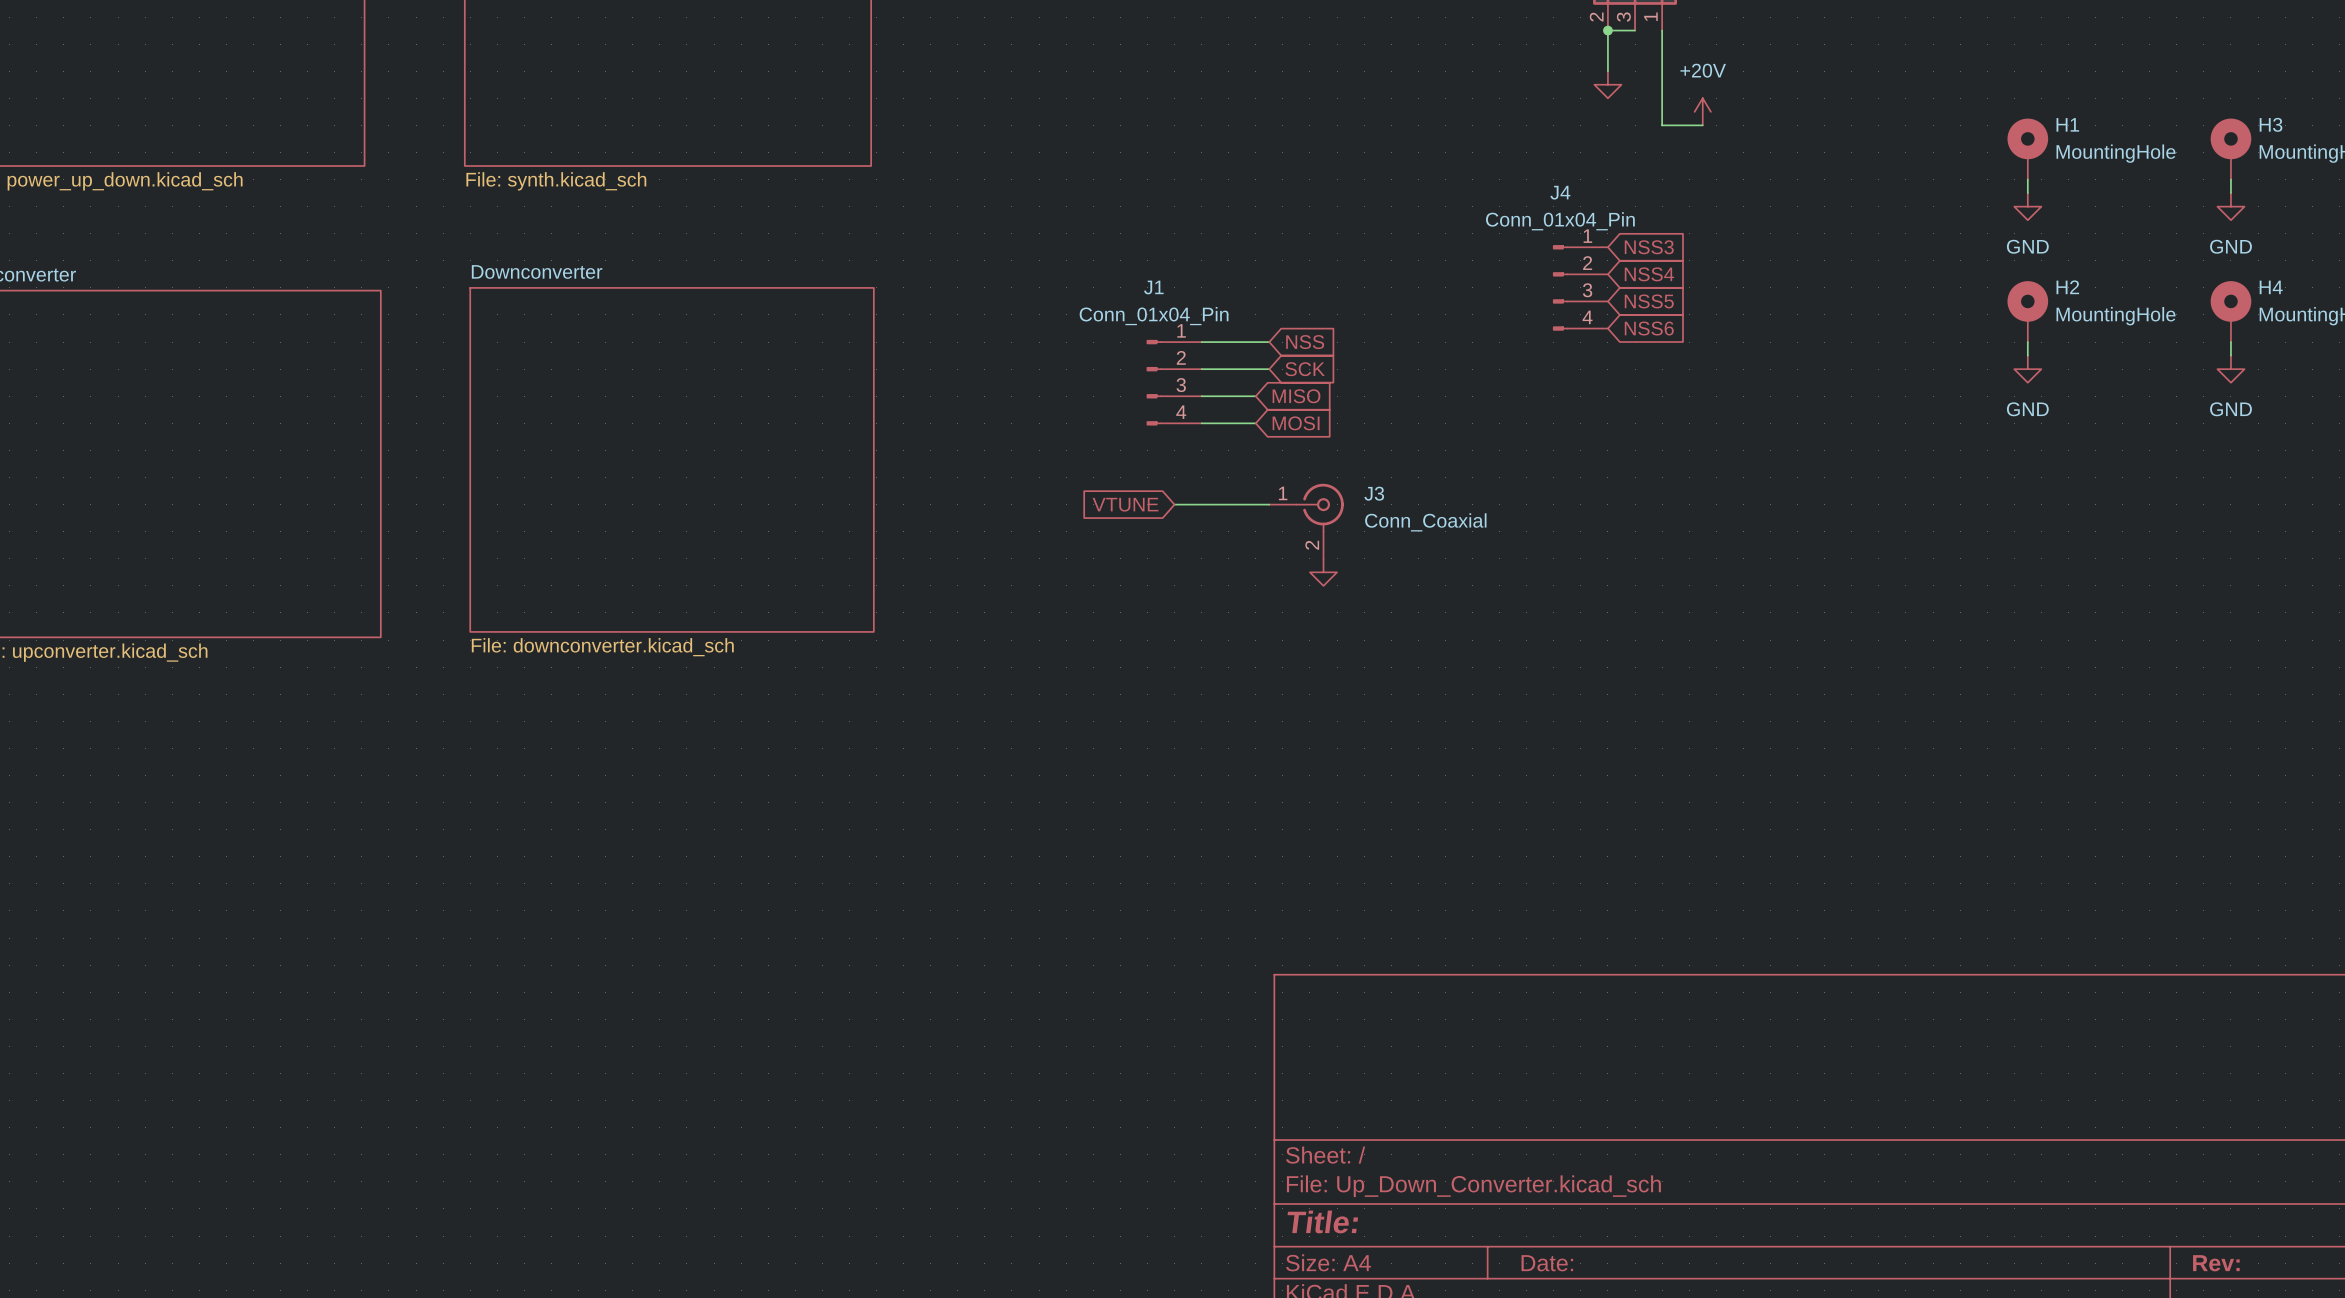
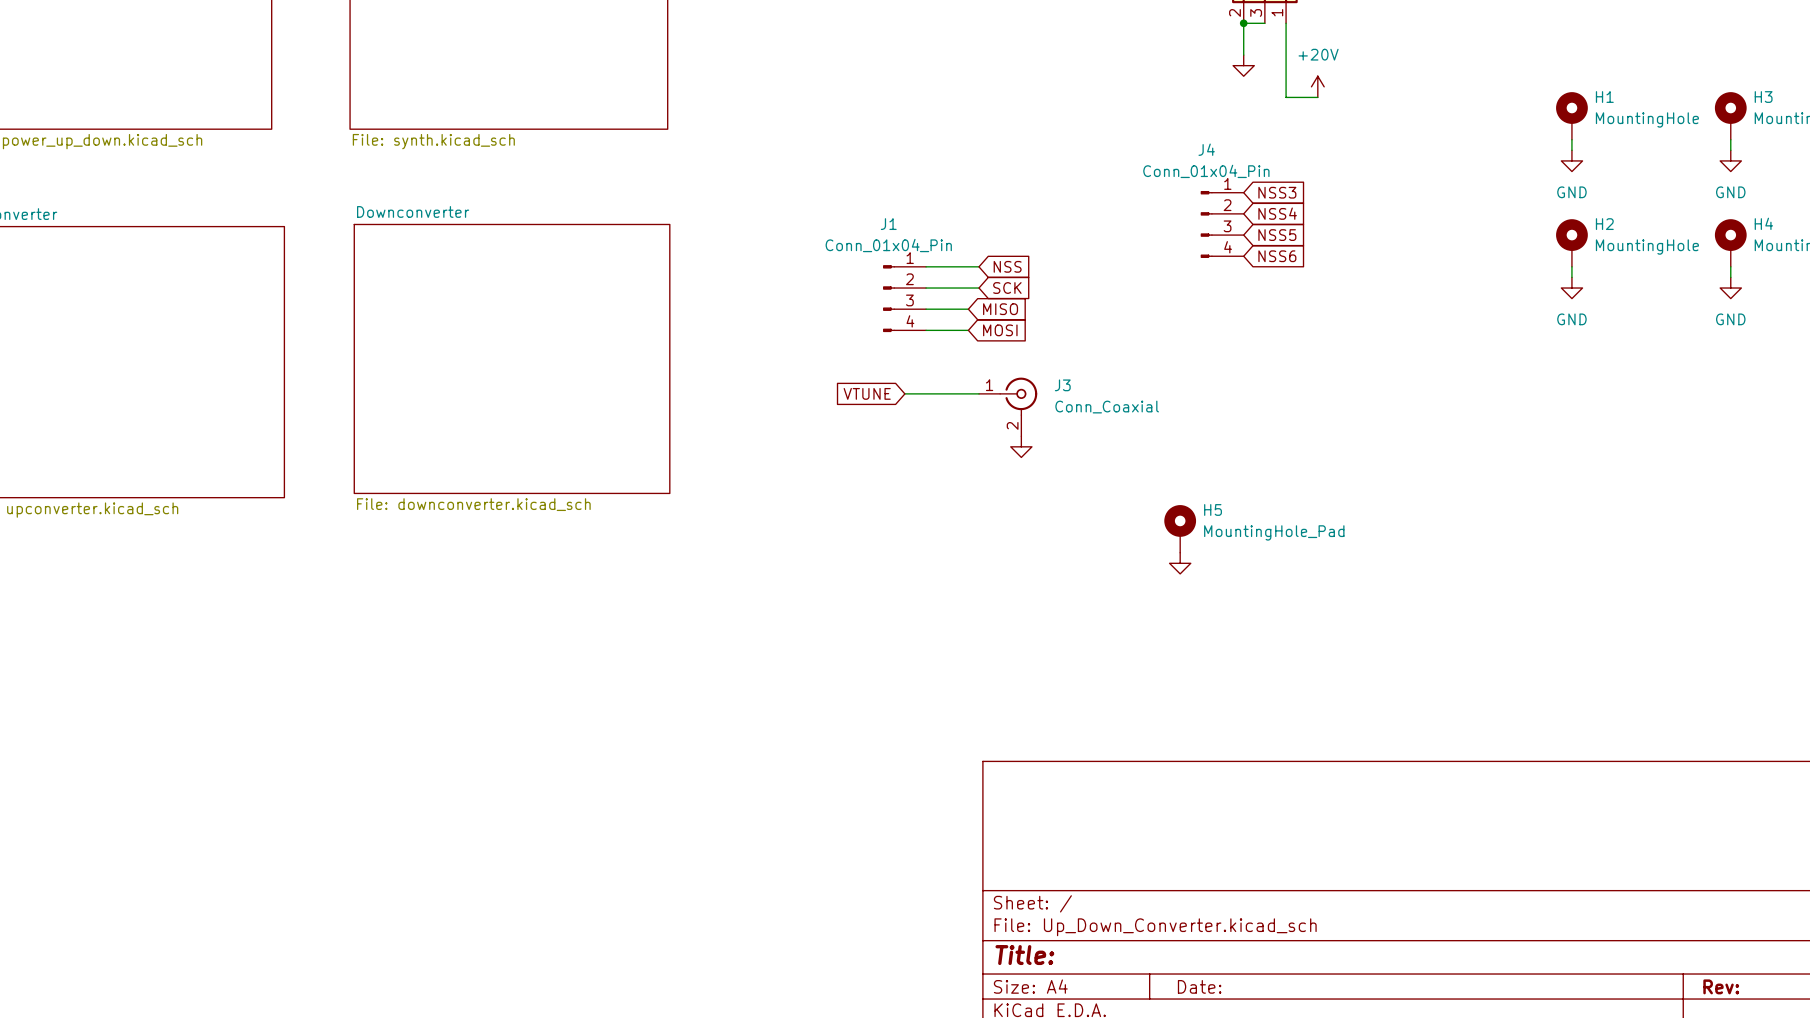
H5: none -> MountingHole_Pad (1180, 528)
power symbol: none -> (1180, 563)

